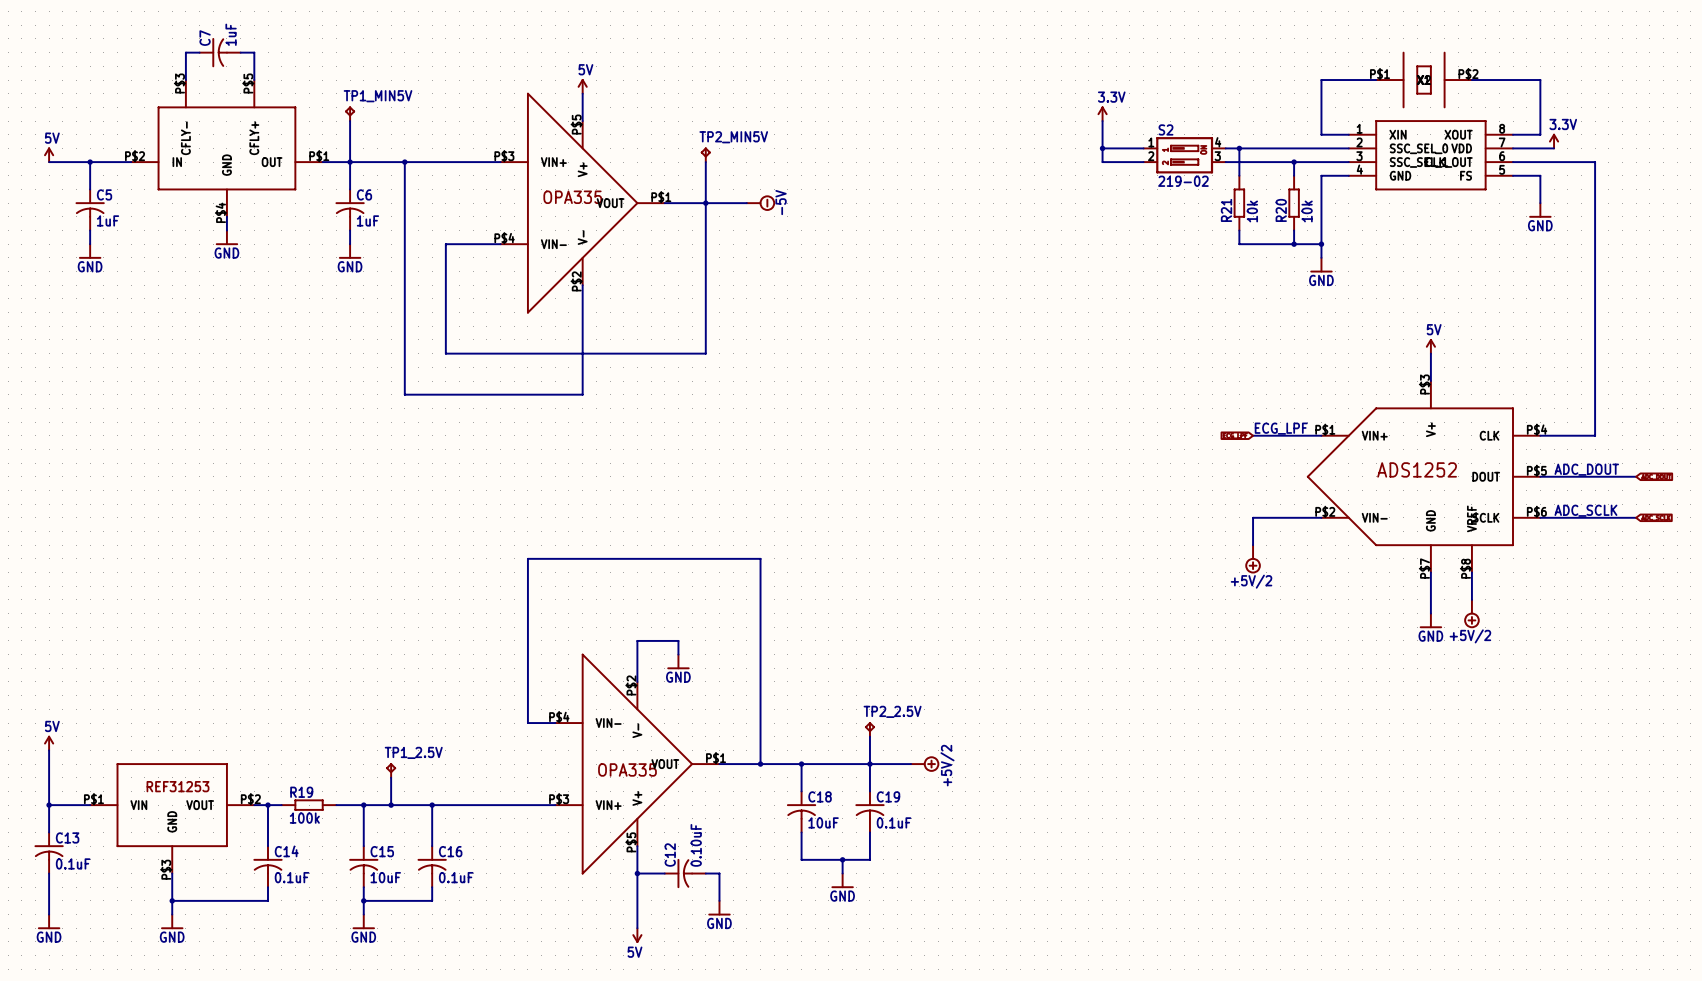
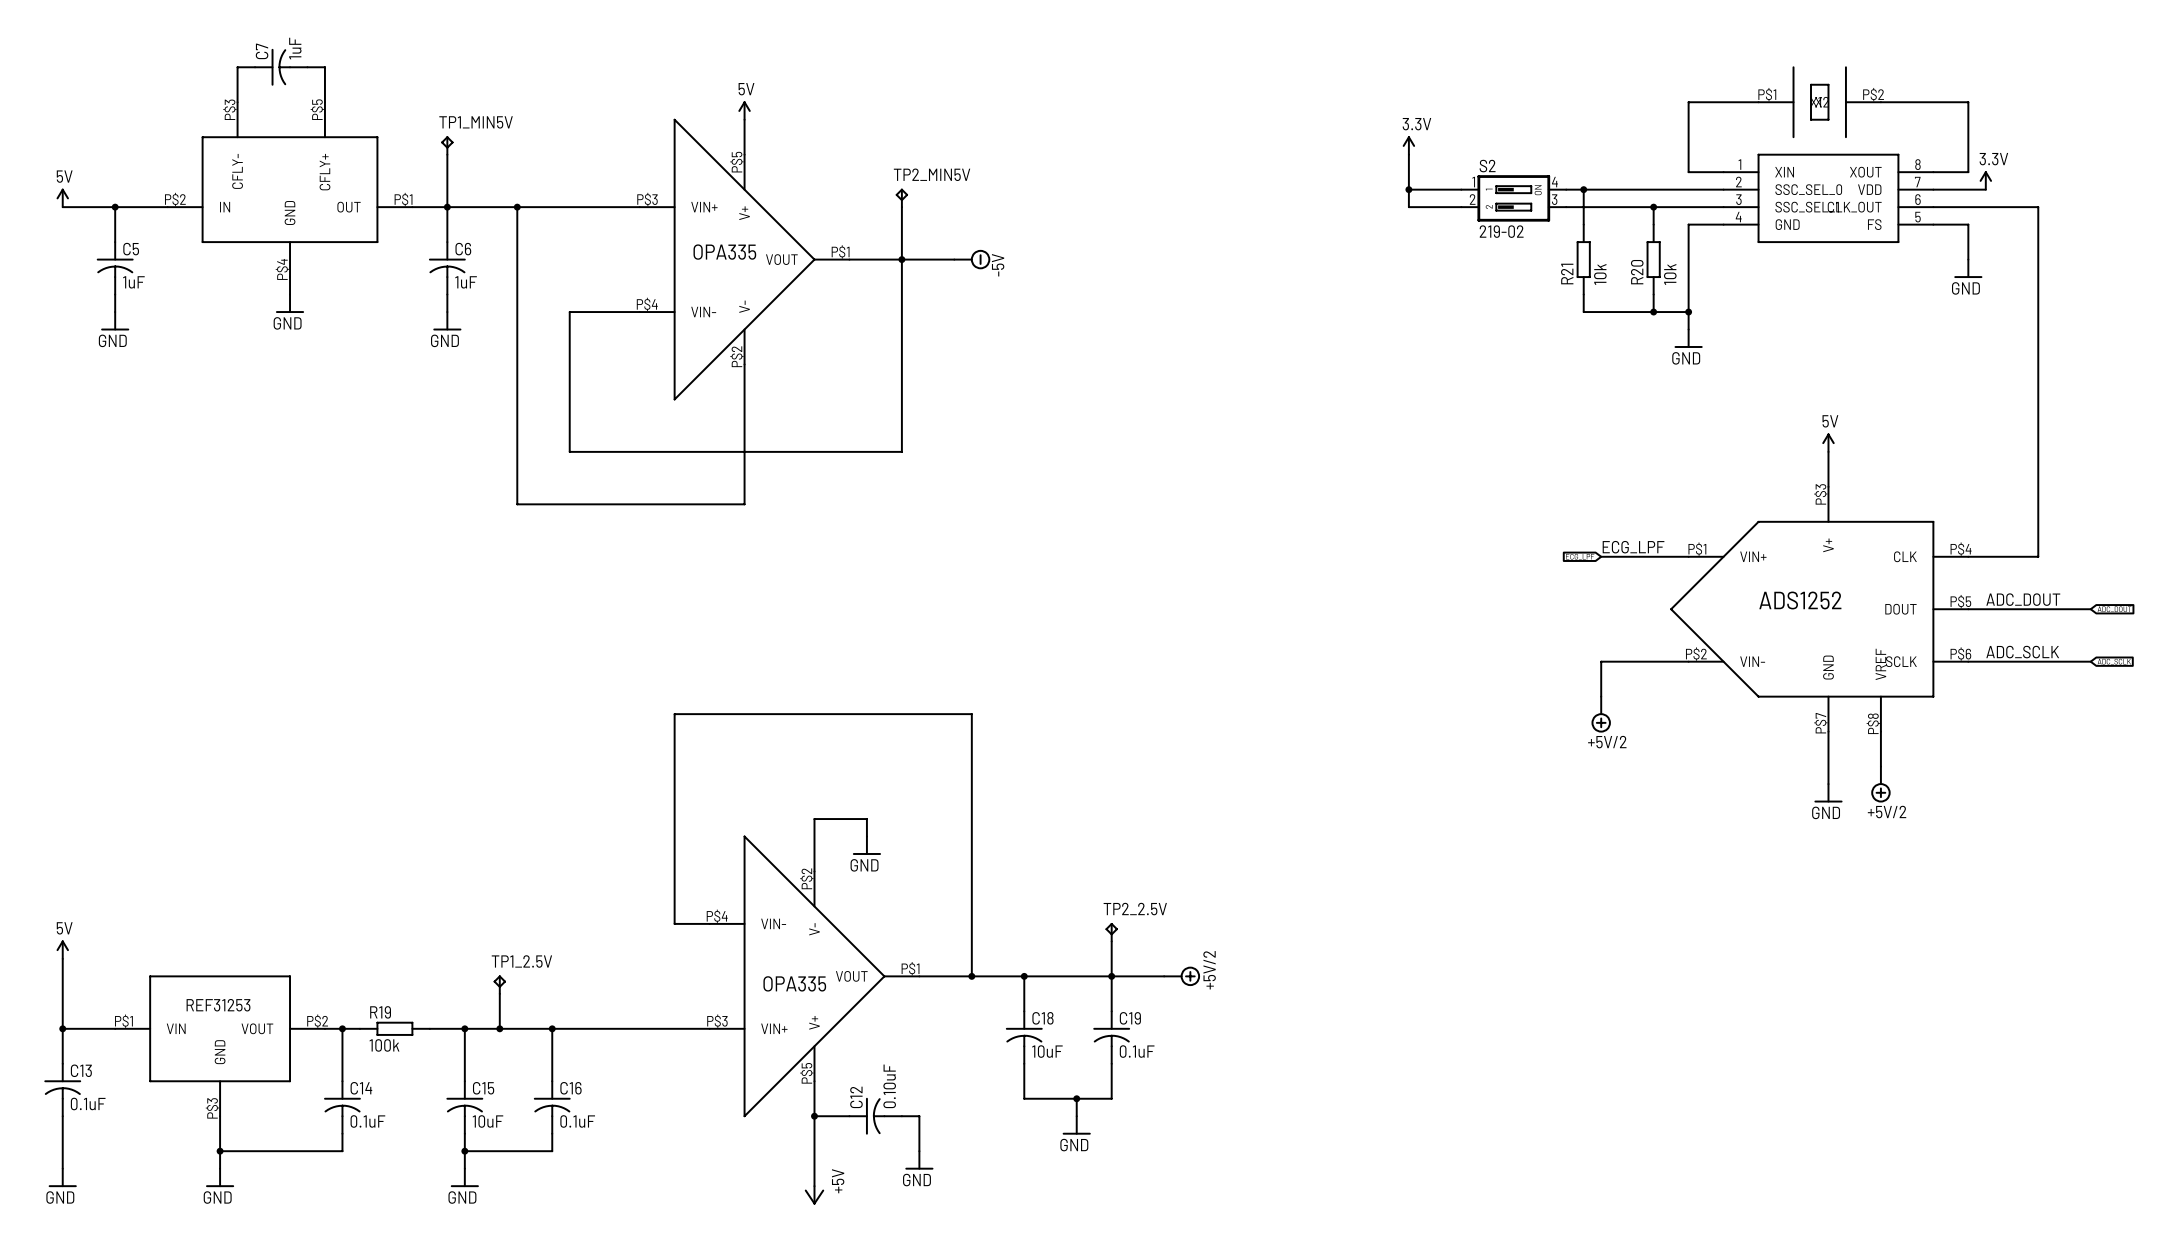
power symbol: 5V (637, 935) -> +5V (814, 1195)

